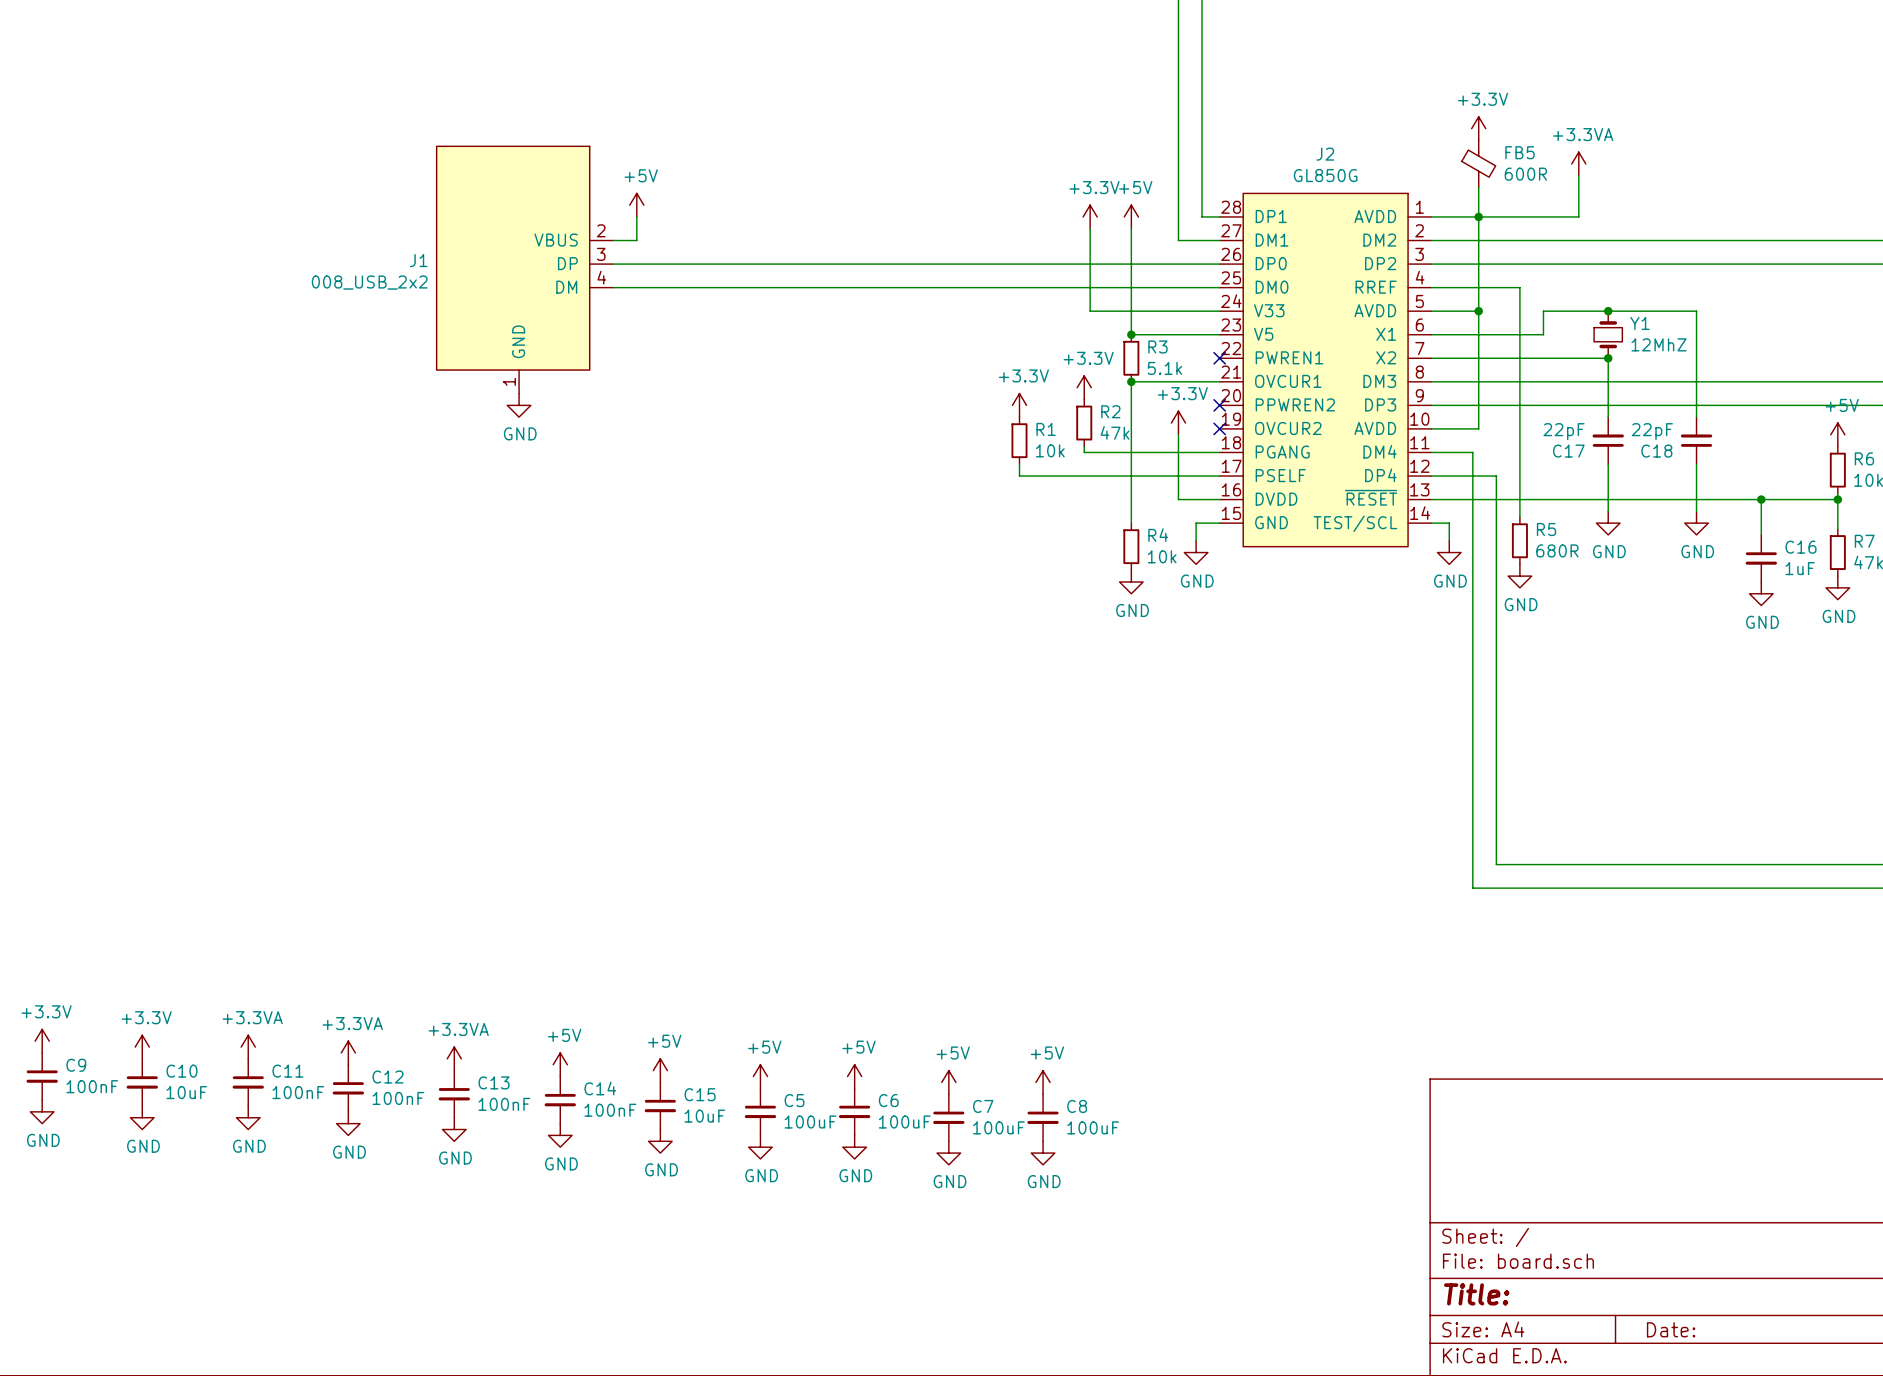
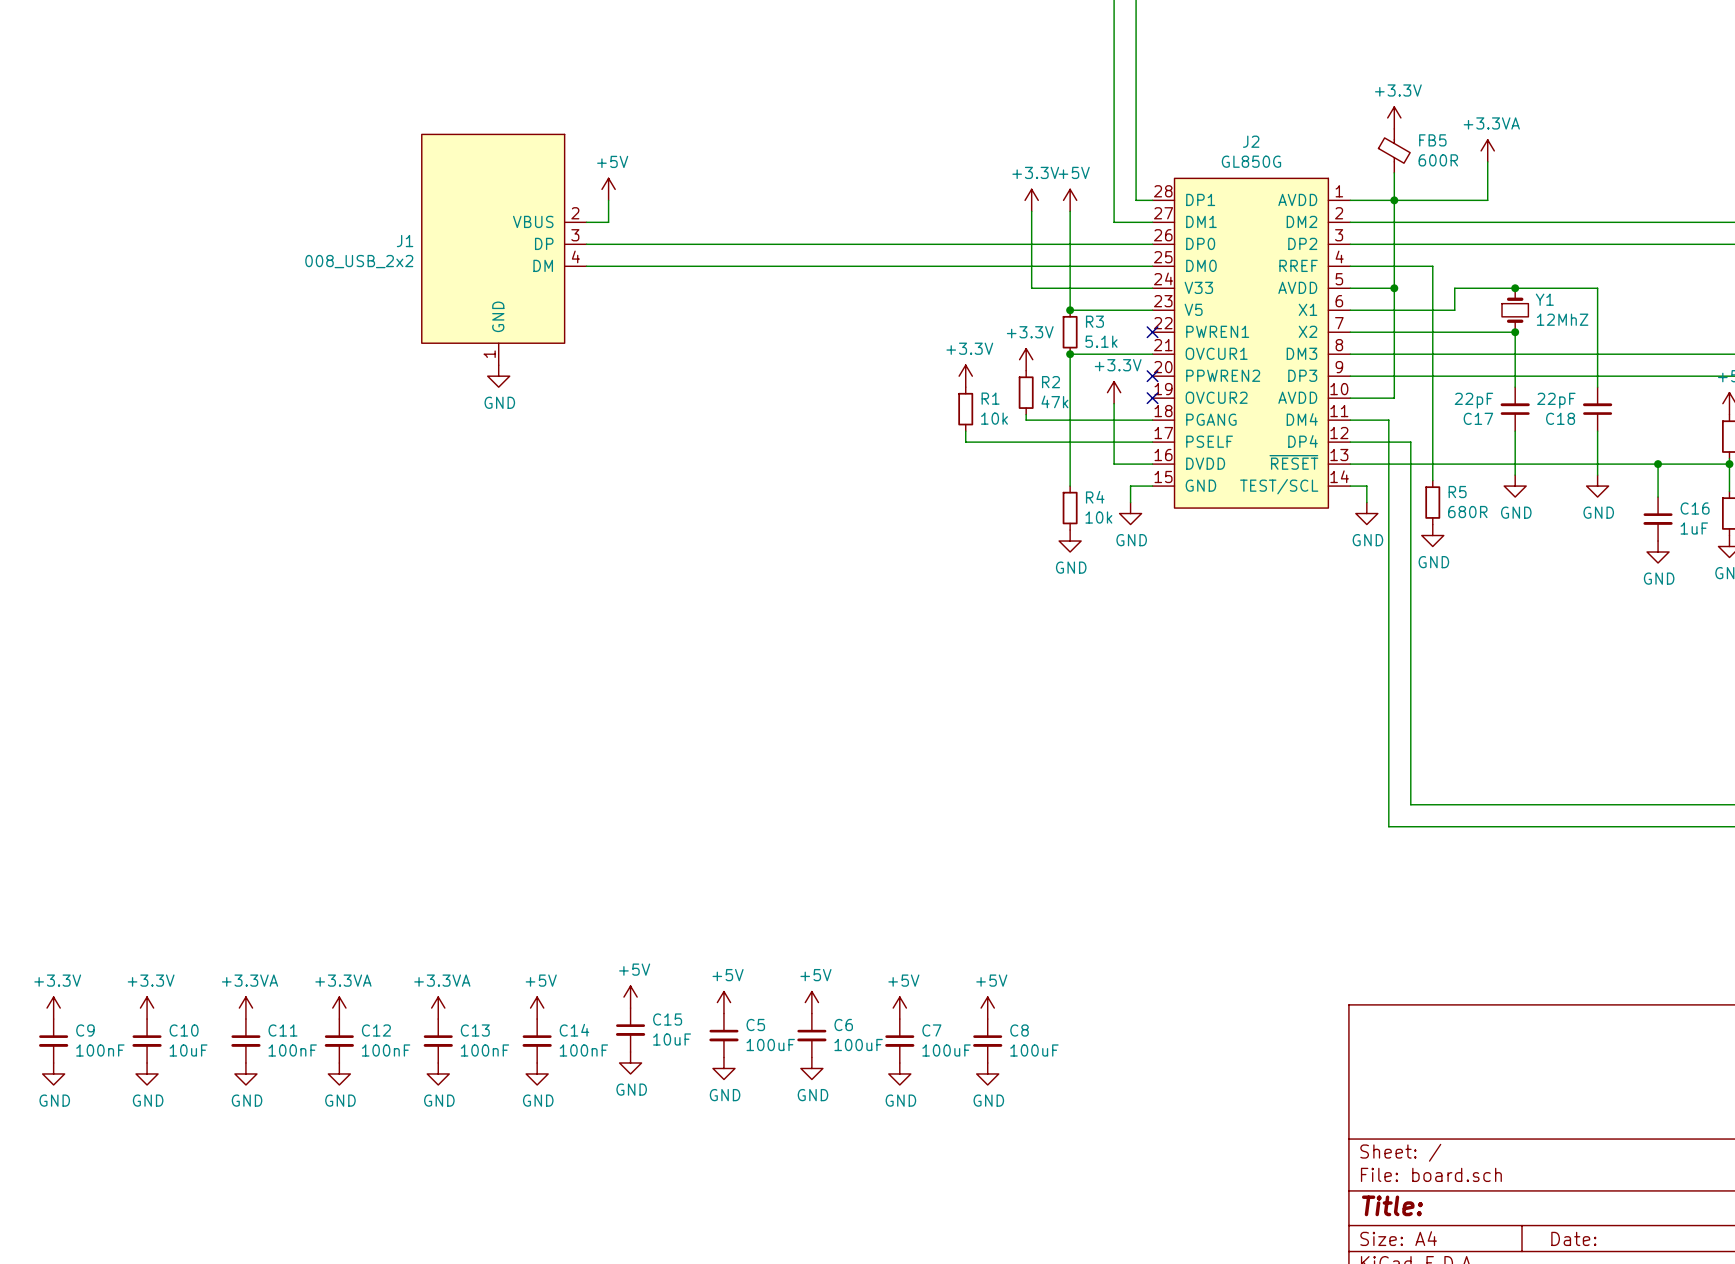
power symbol position: +3.3V (42, 1041) -> +3.3V (53, 1008)
power symbol position: +3.3V (142, 1047) -> +3.3V (147, 1008)
power symbol position: +3.3VA (248, 1047) -> +3.3VA (245, 1008)
power symbol position: +3.3VA (348, 1052) -> +3.3VA (339, 1008)
power symbol position: +3.3VA (454, 1058) -> +3.3VA (438, 1008)
power symbol position: +5V (560, 1064) -> +5V (537, 1008)
C9 position: (42, 1076) -> (53, 1041)
C10 position: (142, 1082) -> (147, 1041)
C11 position: (248, 1082) -> (245, 1041)
C12 position: (348, 1088) -> (339, 1041)
C13 position: (454, 1094) -> (438, 1041)
C14 position: (560, 1100) -> (537, 1041)
power symbol position: GND (42, 1111) -> GND (53, 1073)
power symbol position: GND (142, 1117) -> GND (147, 1073)
power symbol position: GND (248, 1117) -> GND (245, 1073)
power symbol position: GND (348, 1123) -> GND (339, 1073)
power symbol position: GND (454, 1129) -> GND (438, 1073)
power symbol position: GND (560, 1135) -> GND (537, 1073)

